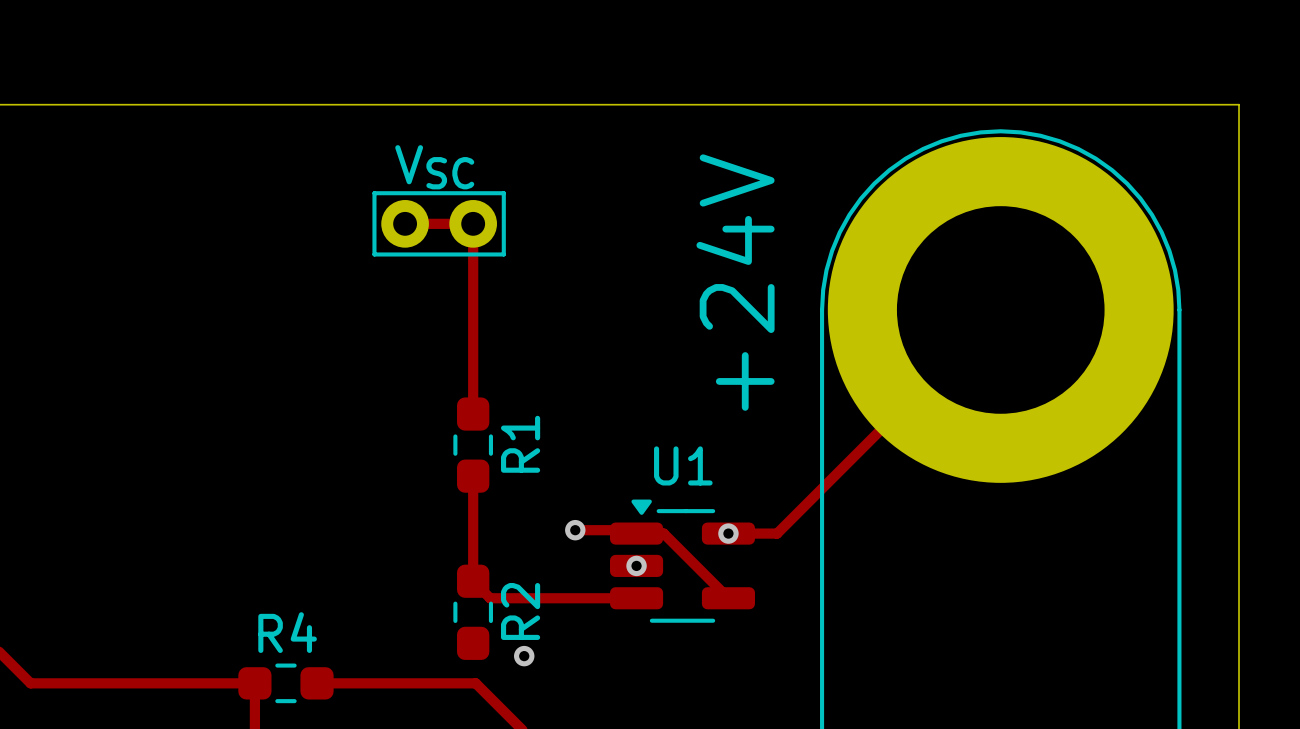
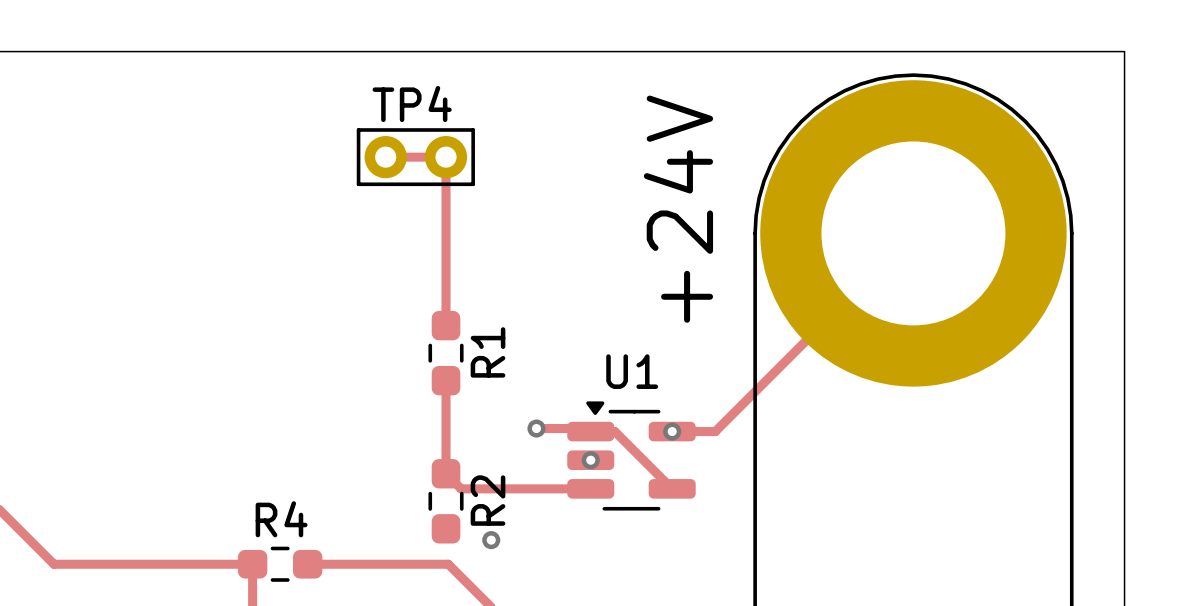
VSC name: VSC (434, 167) -> TP4 (412, 104)

